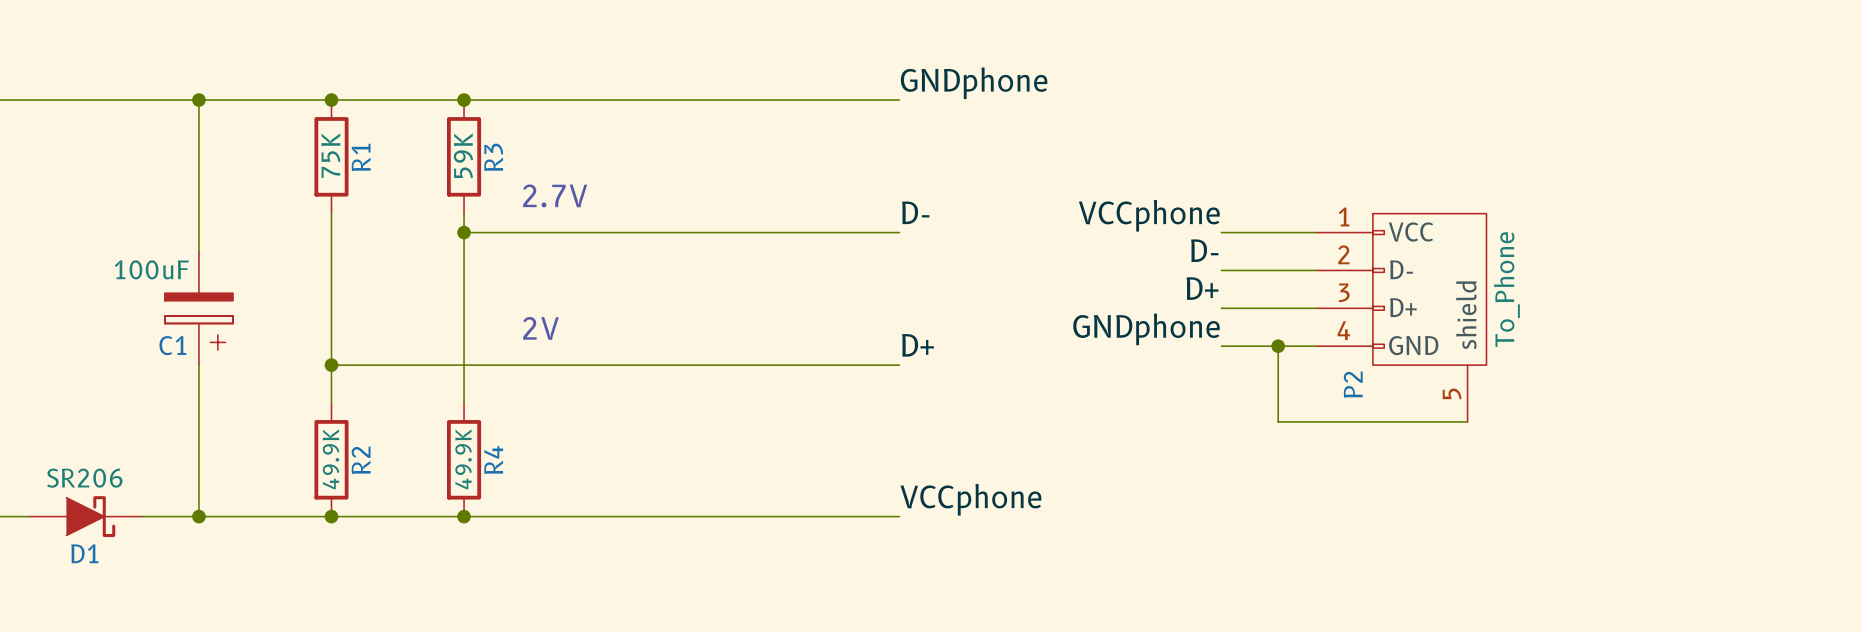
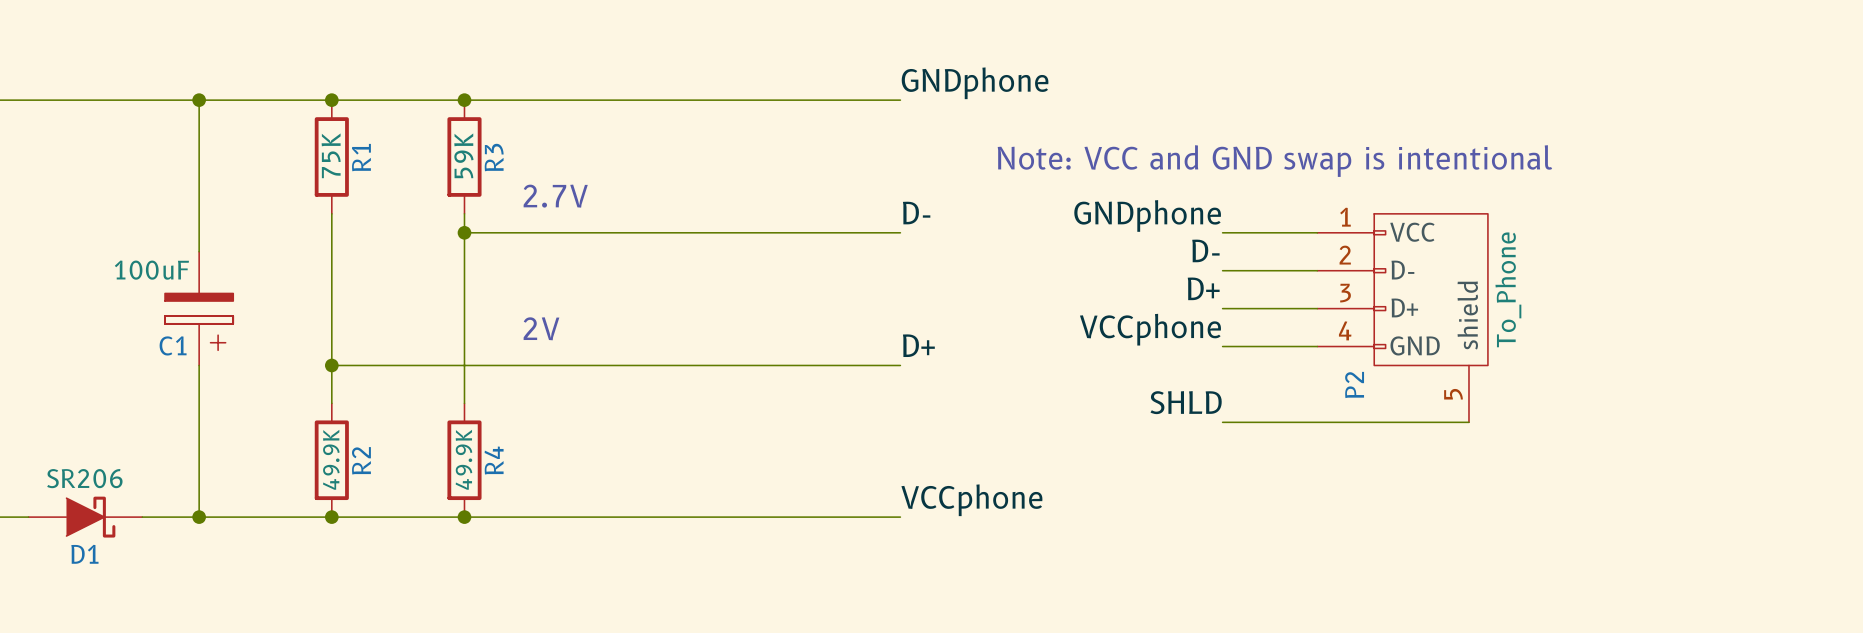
text: none -> Note: VCC and GND swap is intentional (1274, 161)
label: VCCphone (1149, 215) -> GNDphone (1147, 215)
label: GNDphone (1146, 329) -> VCCphone (1150, 329)
wire: (1278, 346) (1278, 421) -> (1222, 422) (1279, 422)
junction: (1278, 346) -> none
label: none -> SHLD (1186, 402)

